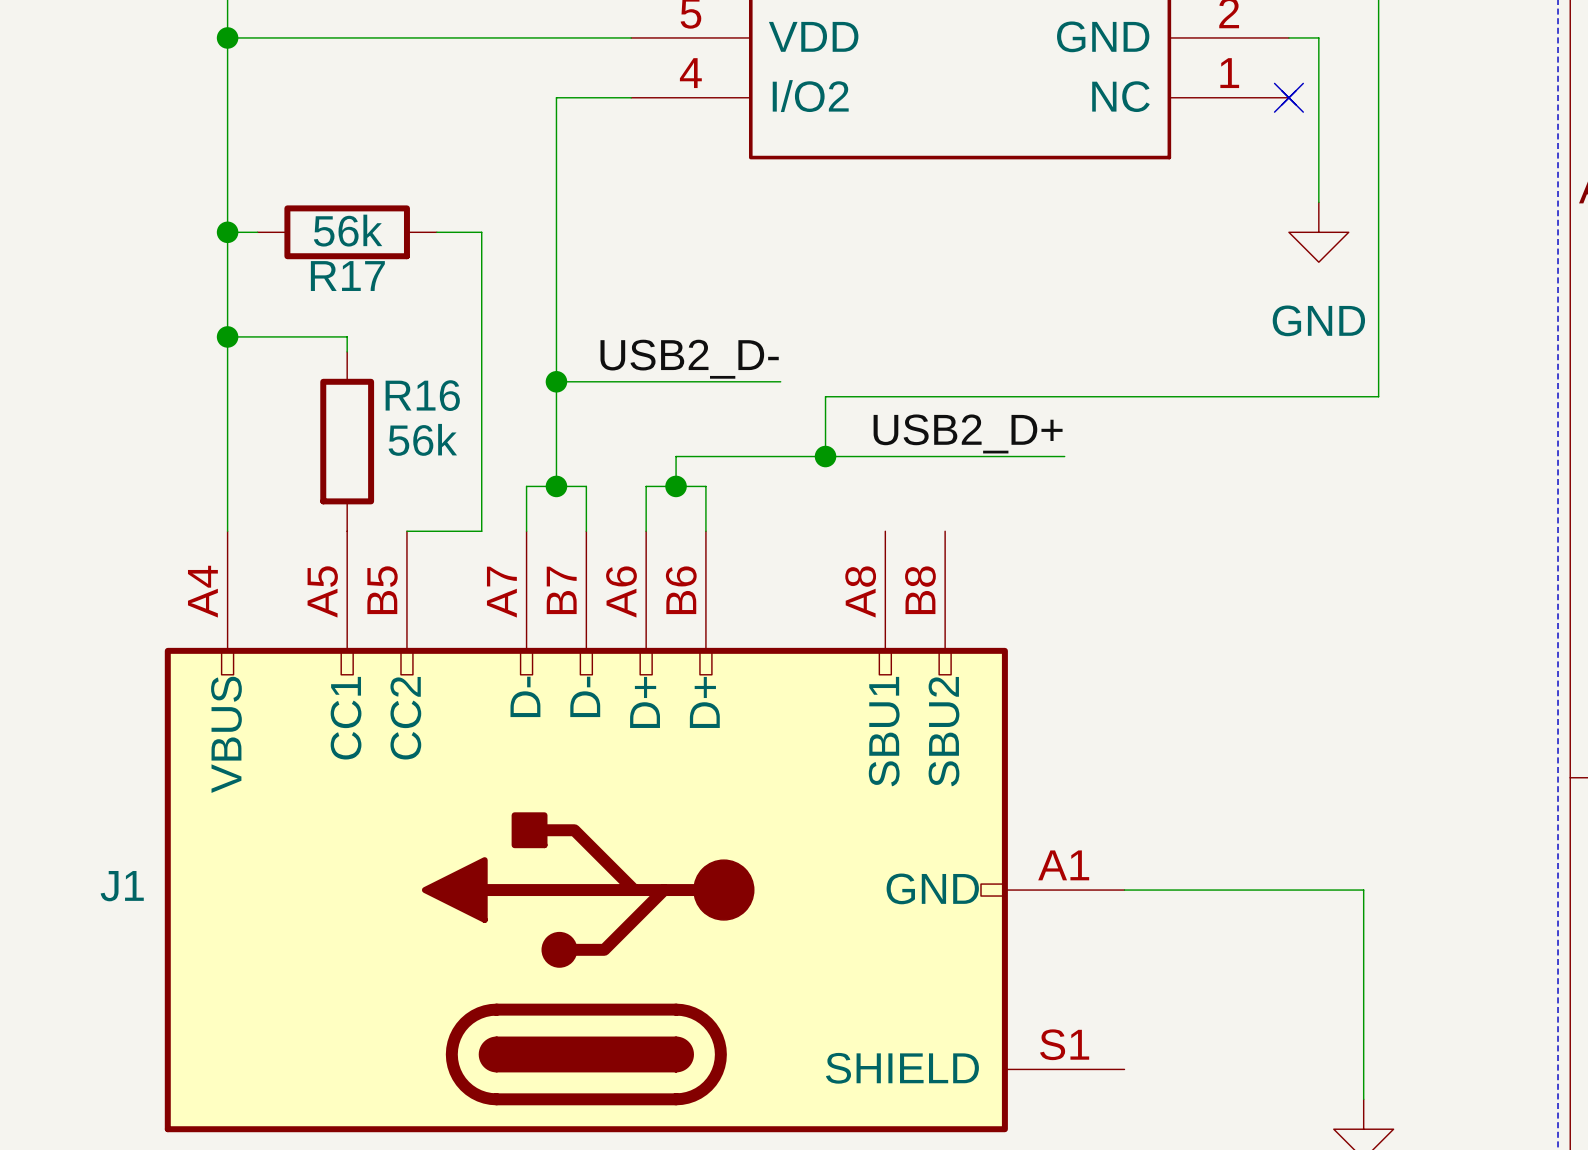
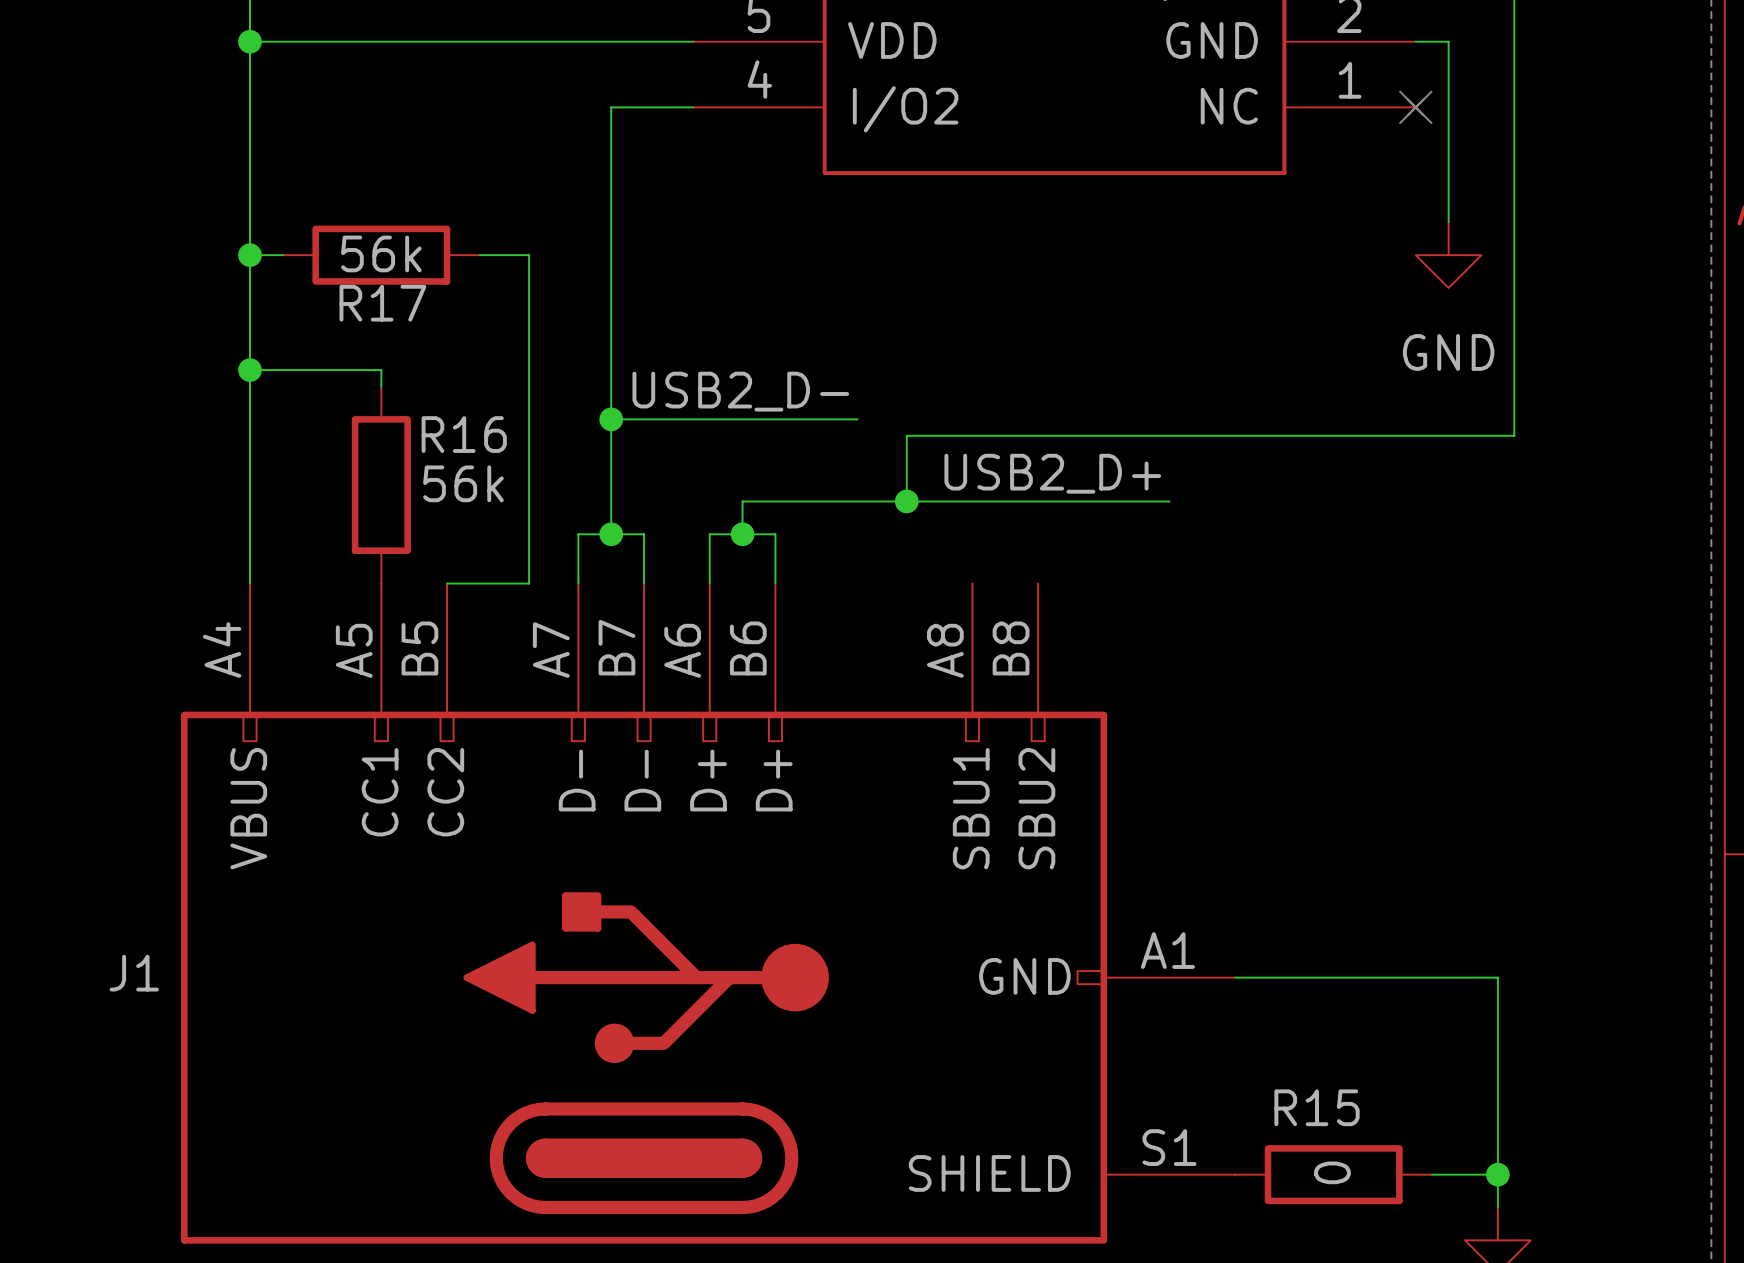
R15: none -> 0 (1333, 1174)
wire: none -> (1432, 1174) (1497, 1174)
junction: none -> (1497, 1174)

